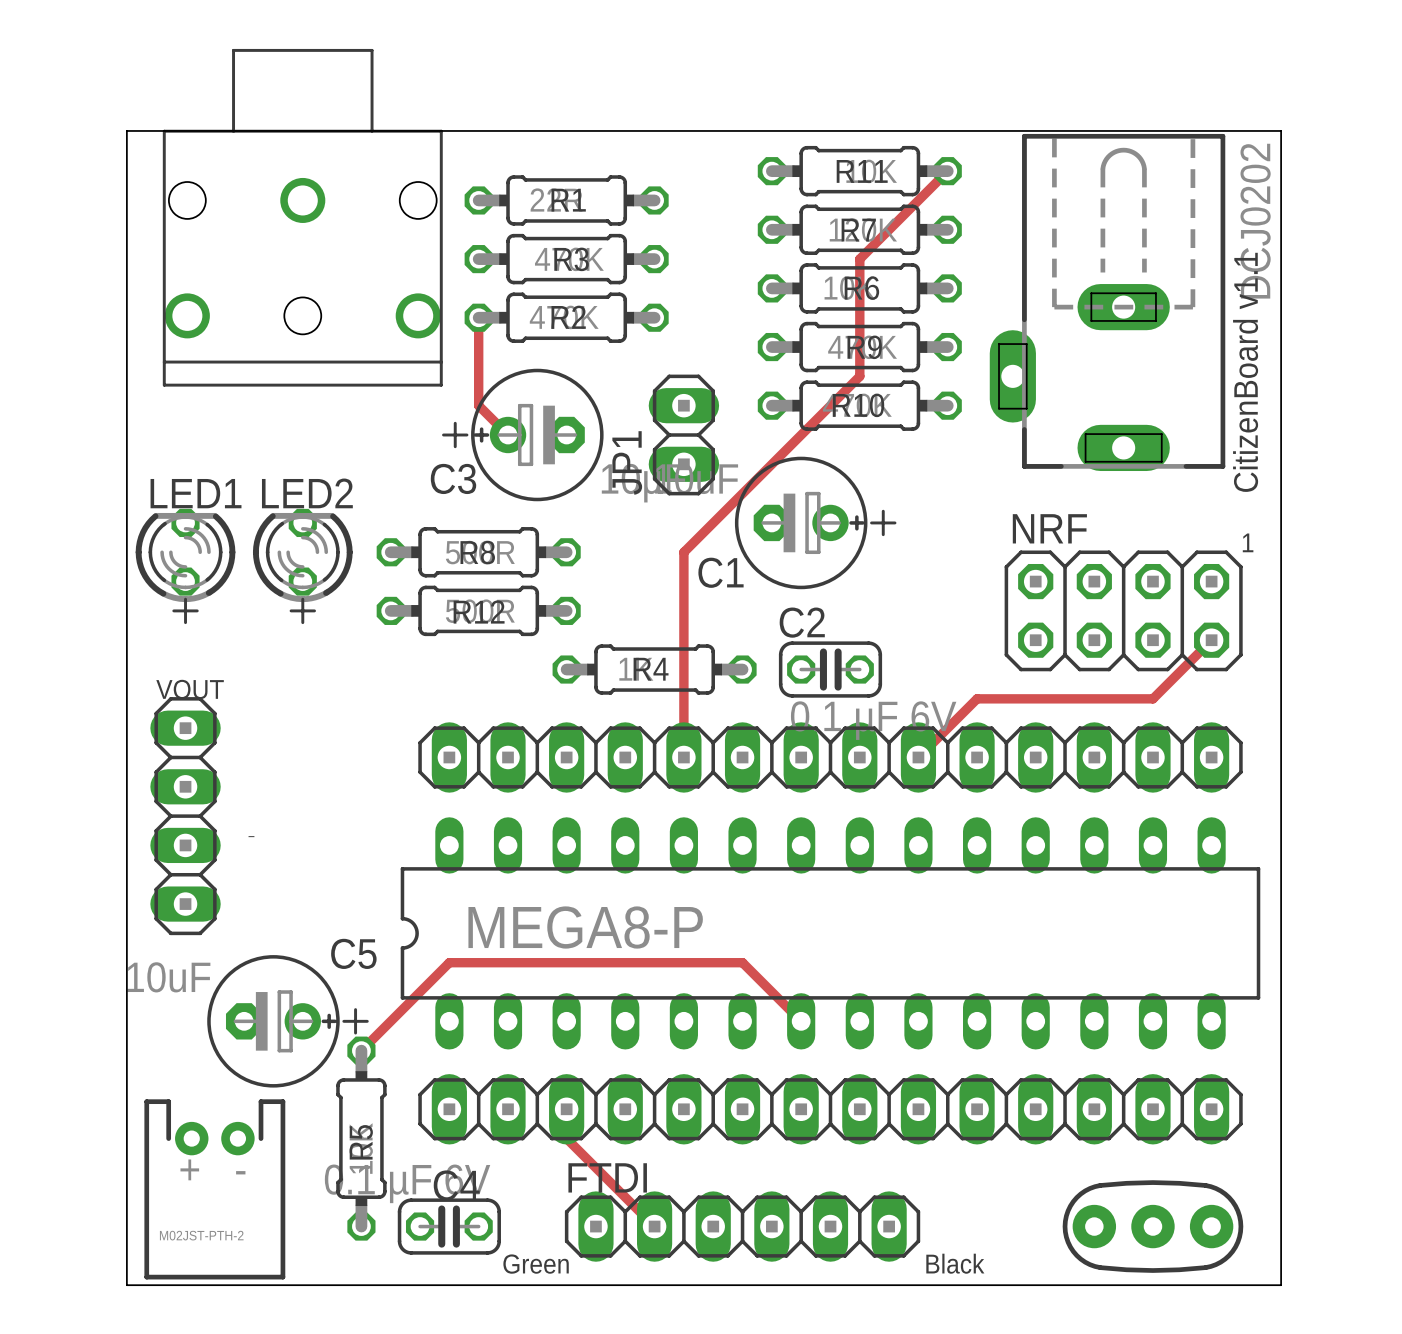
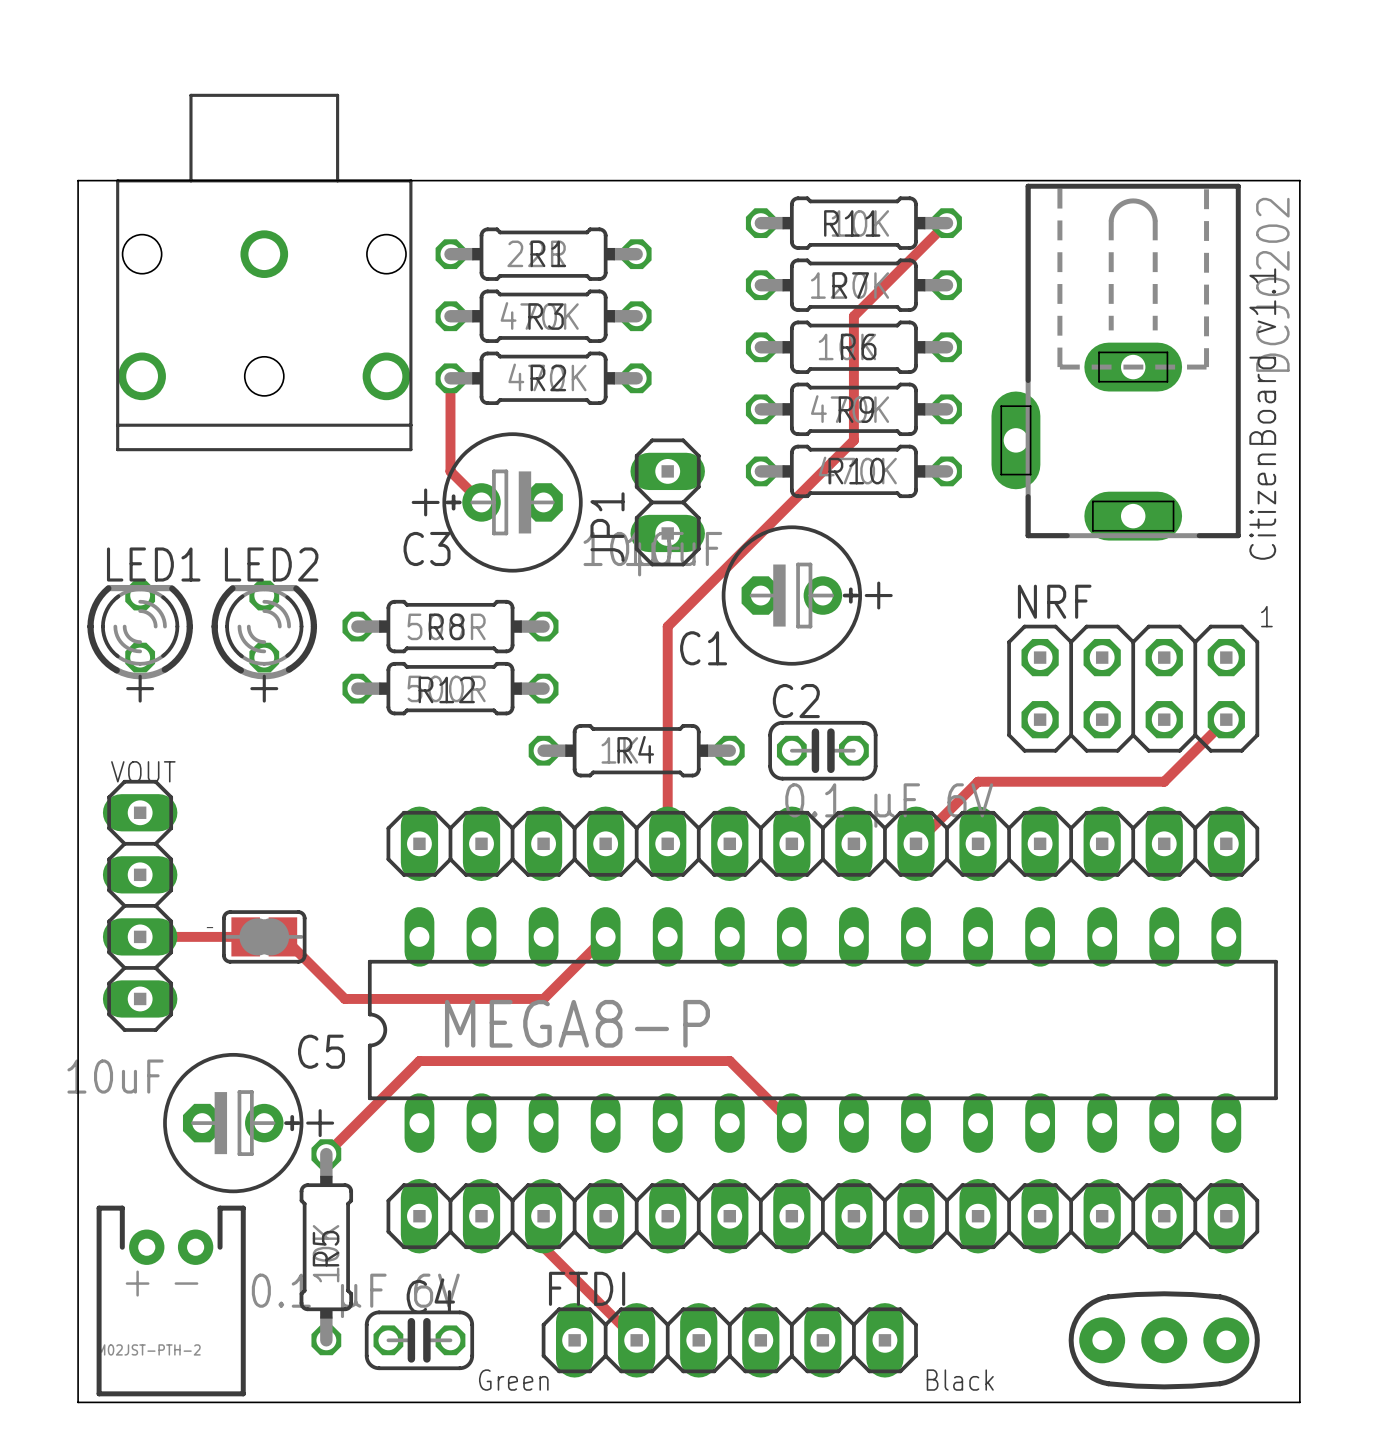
track: none -> (140, 936) (245, 936)
part: none -> (264, 936)
track: none -> (282, 936) (344, 998) (543, 998) (605, 936)

